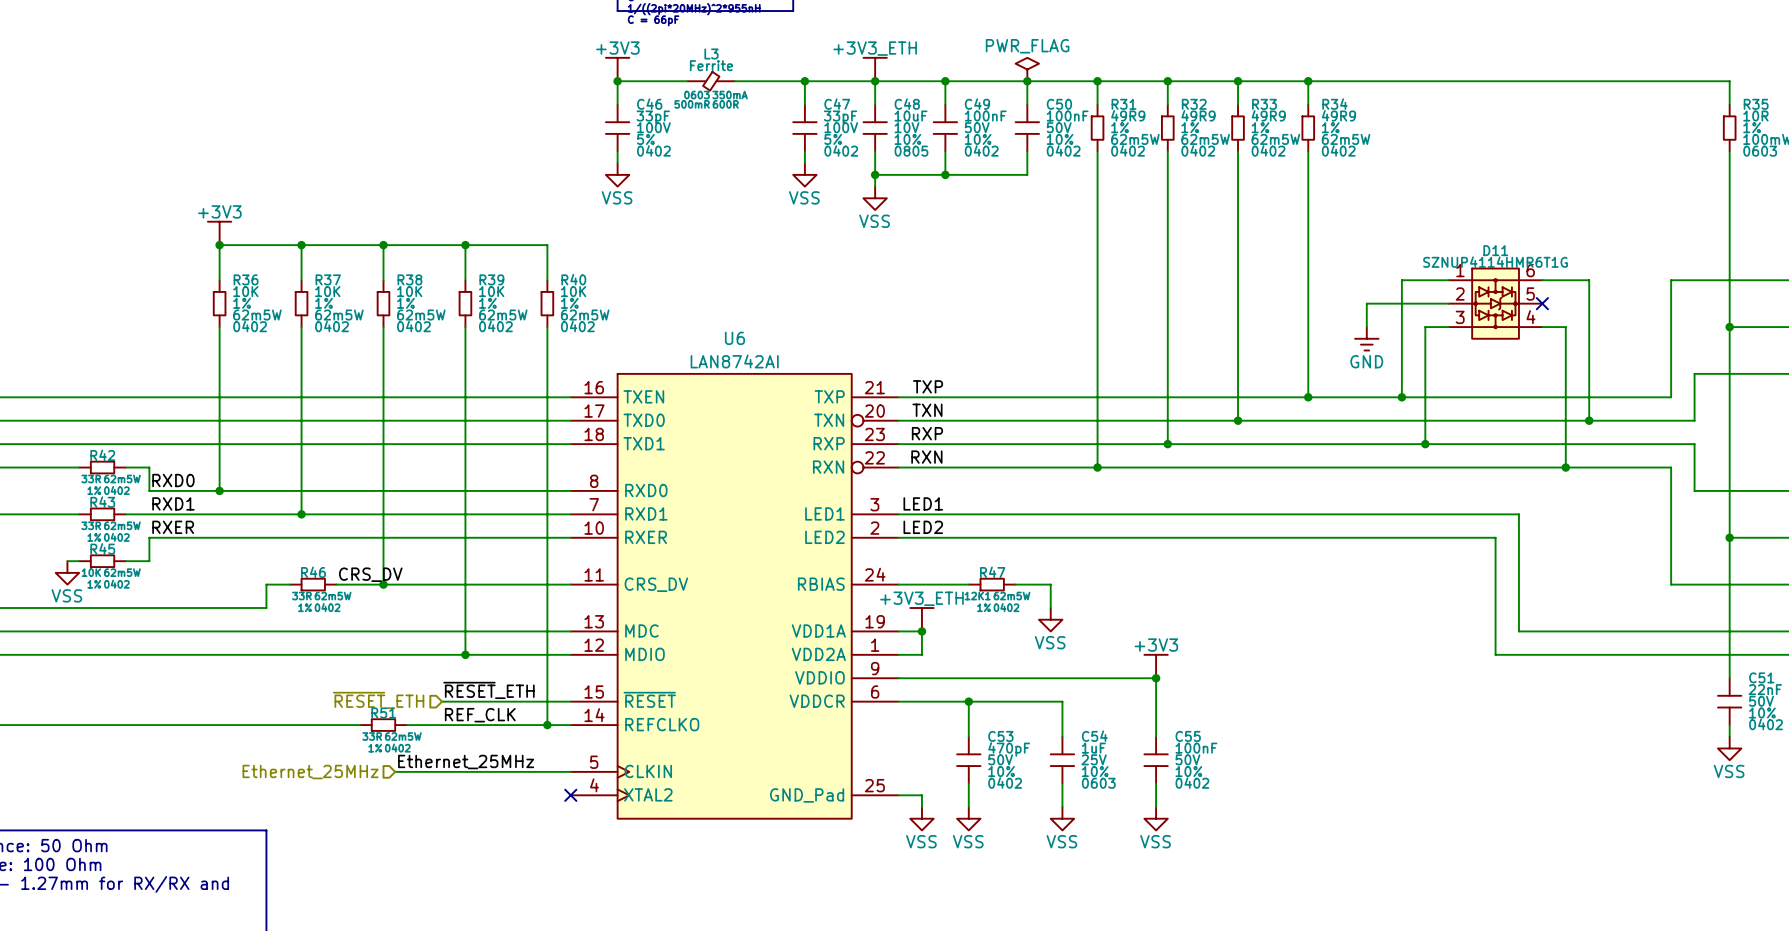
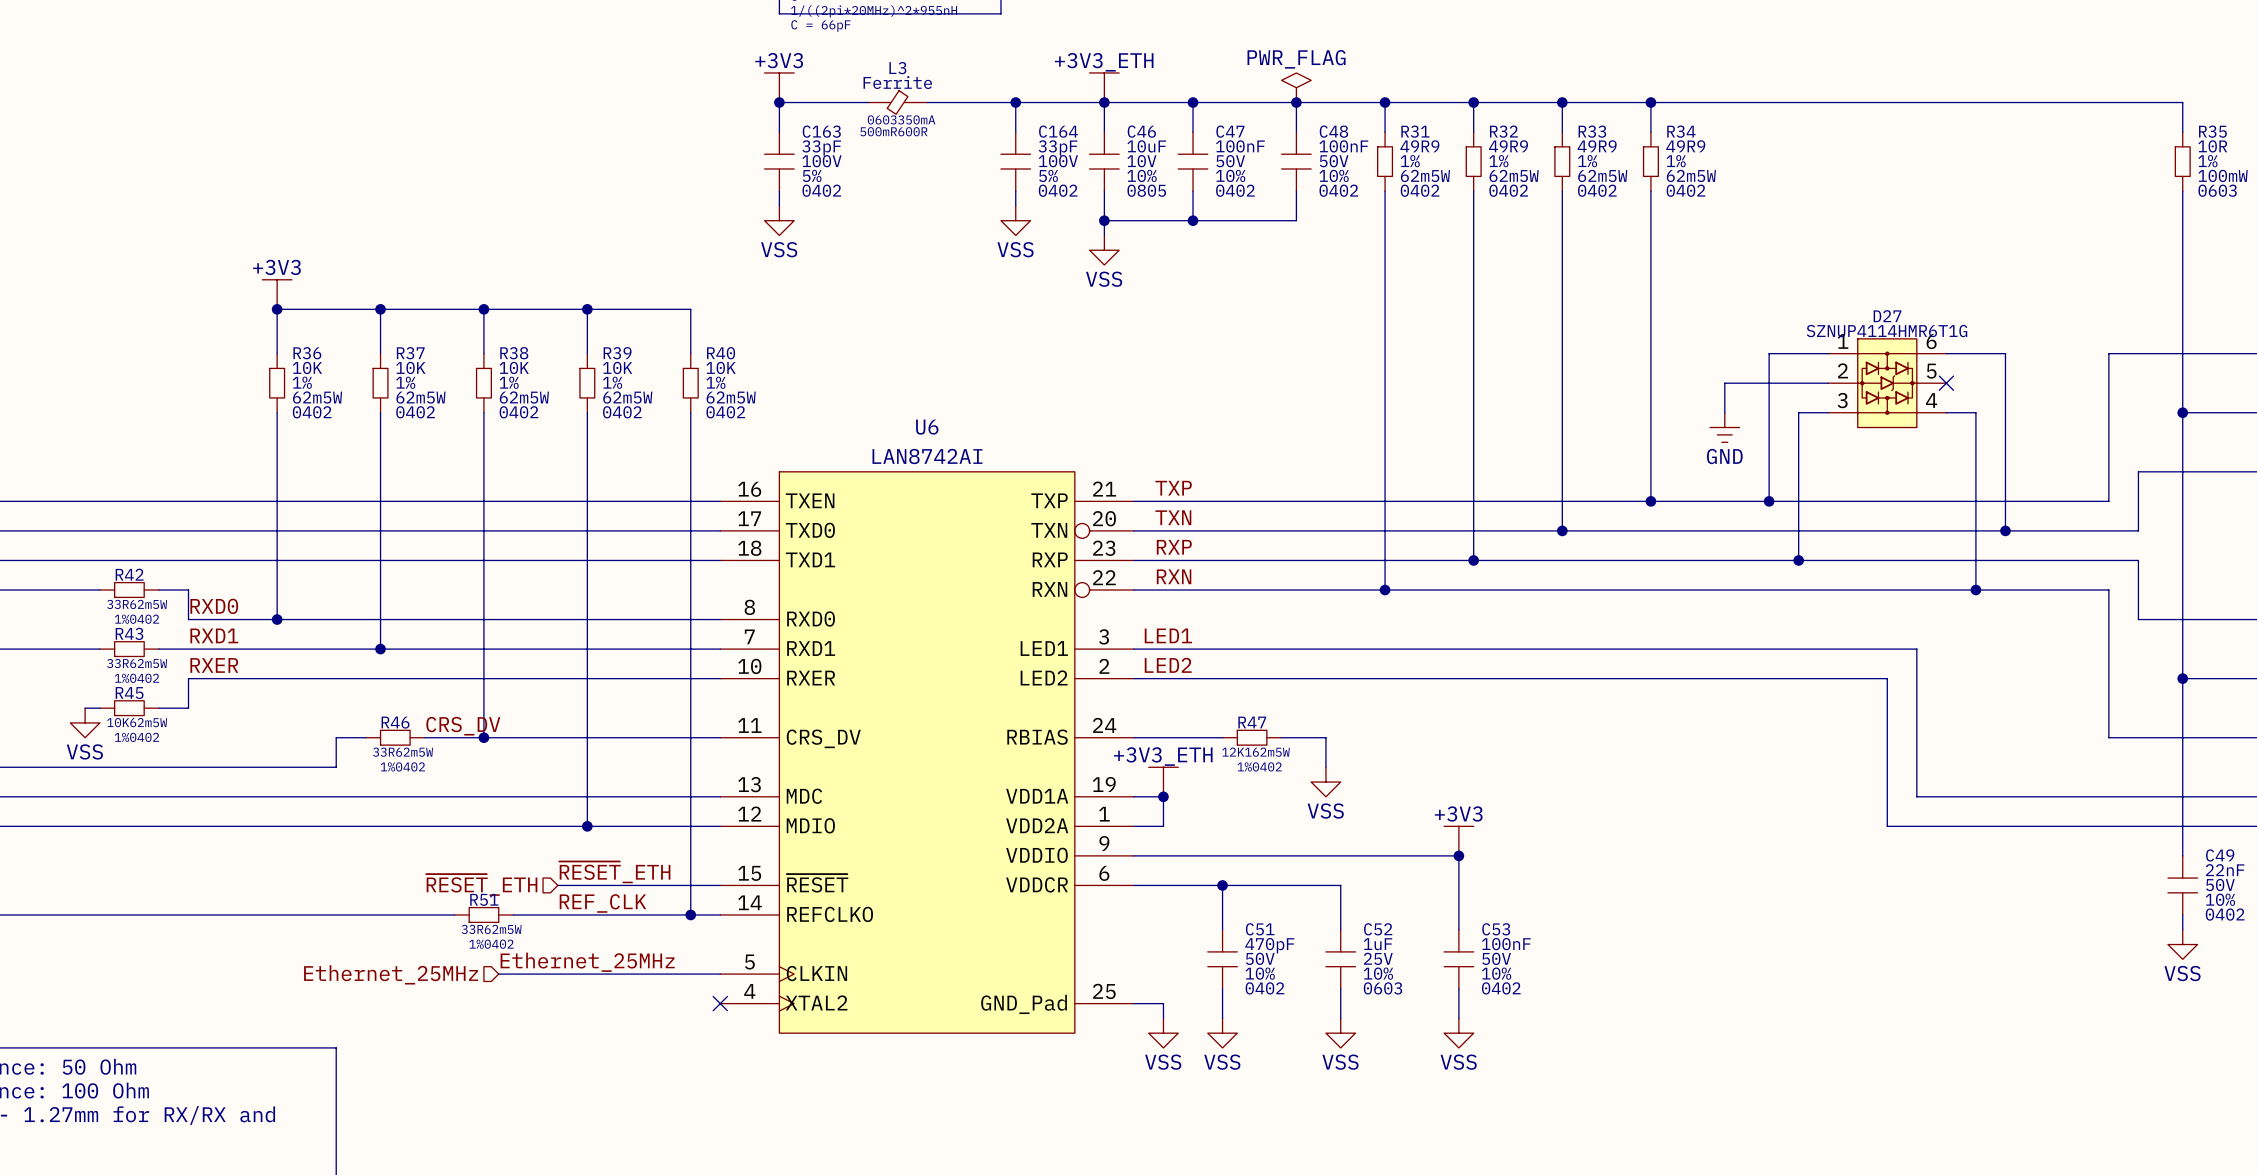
C46 name: C46 (649, 104) -> C163 (821, 131)
C47 name: C47 (837, 104) -> C164 (1058, 131)
C48 name: C48 (907, 104) -> C46 (1141, 131)
C49 name: C49 (977, 104) -> C47 (1230, 131)
C50 name: C50 (1059, 104) -> C48 (1333, 131)
D11 name: D11 (1495, 250) -> D27 (1887, 316)
C51 name: C51 (1761, 677) -> C49 (2220, 855)
C53 name: C53 (1000, 736) -> C51 (1260, 929)
C54 name: C54 (1094, 736) -> C52 (1378, 929)
C55 name: C55 (1188, 736) -> C53 (1496, 929)

